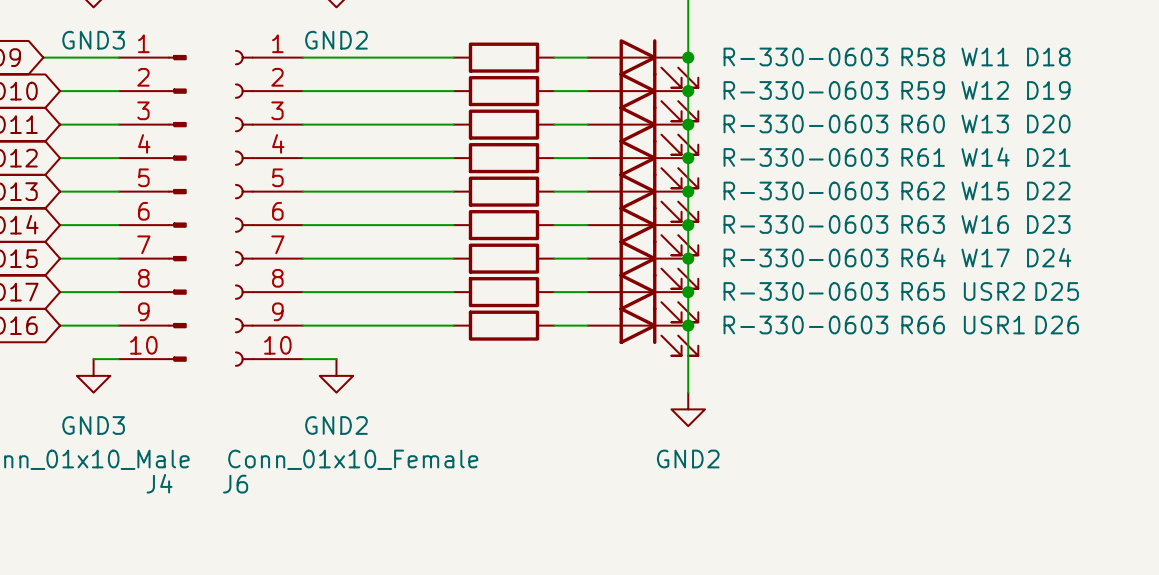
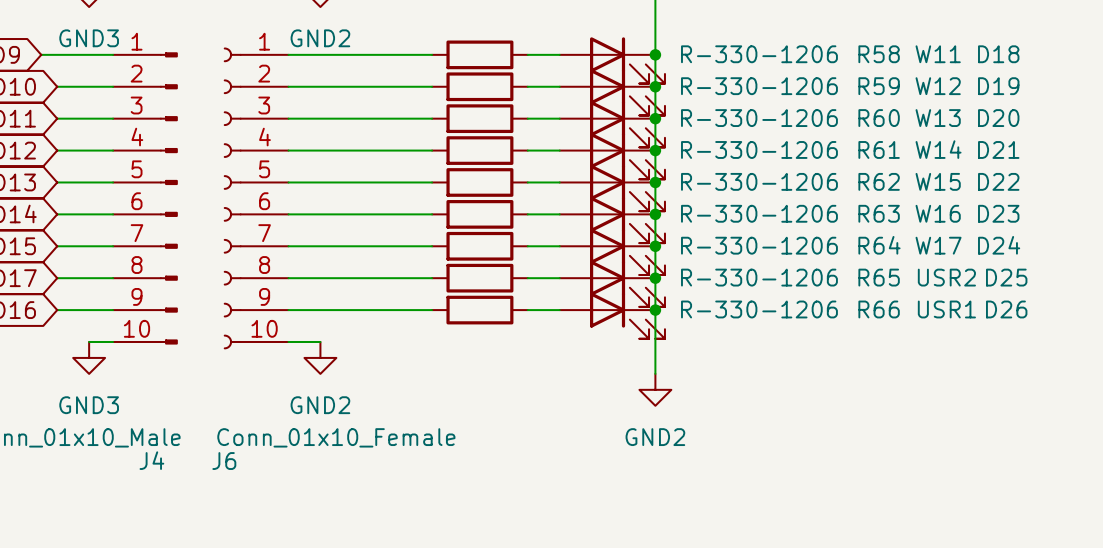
R58 value: R-330-0603 (805, 56) -> R-330-1206 (759, 54)
R59 value: R-330-0603 (805, 90) -> R-330-1206 (759, 86)
R60 value: R-330-0603 (805, 123) -> R-330-1206 (759, 118)
R61 value: R-330-0603 (805, 157) -> R-330-1206 (759, 149)
R62 value: R-330-0603 (805, 190) -> R-330-1206 (759, 181)
R63 value: R-330-0603 (805, 224) -> R-330-1206 (759, 213)
R64 value: R-330-0603 (805, 257) -> R-330-1206 (759, 245)
R65 value: R-330-0603 (805, 291) -> R-330-1206 (759, 277)
R66 value: R-330-0603 (805, 325) -> R-330-1206 (759, 309)

